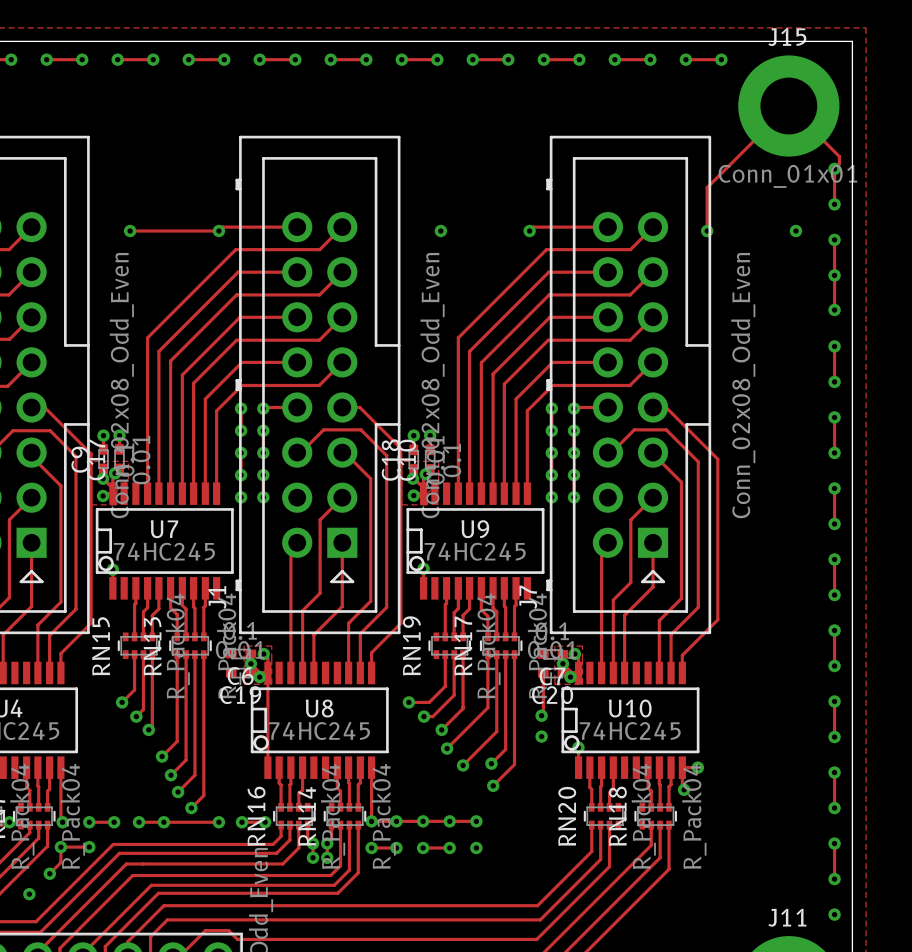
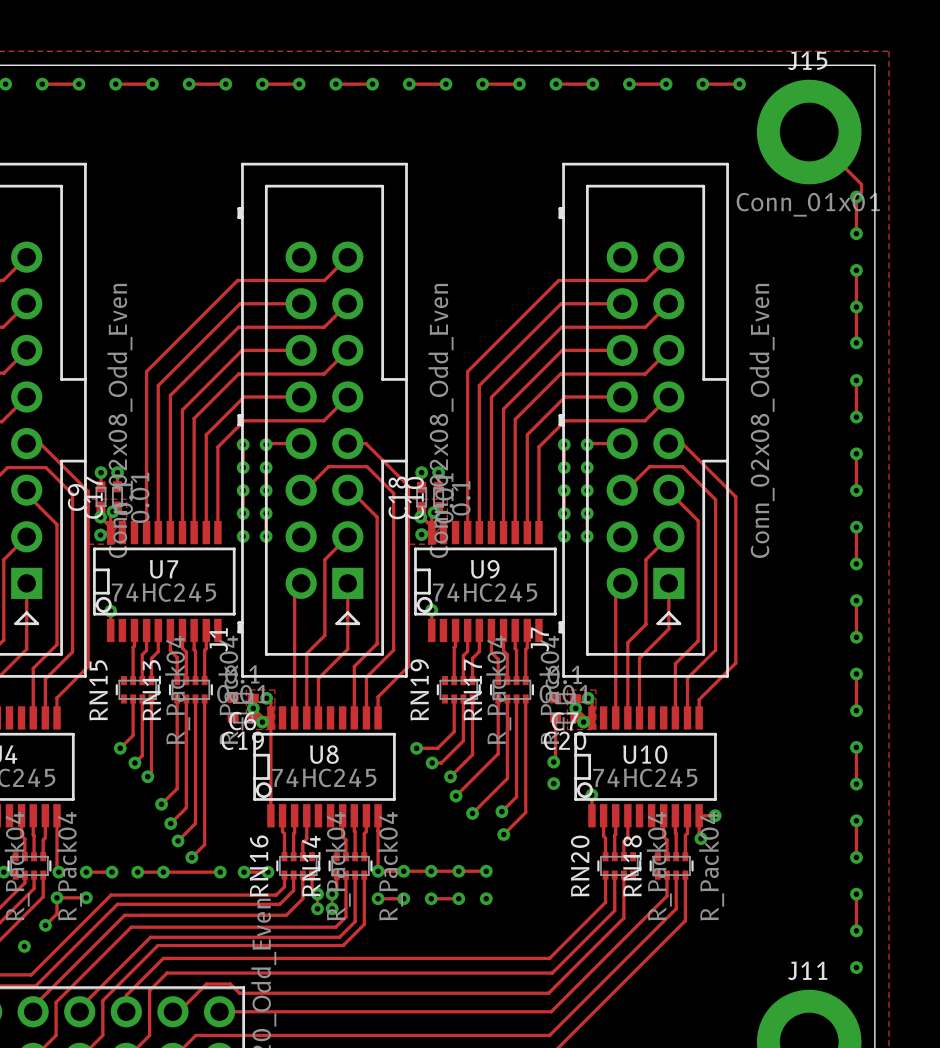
track: (788, 106) (707, 187) (707, 231) -> none
track: (297, 227) (222, 227) (218, 231) (130, 231) -> none
track: (607, 227) (533, 227) (529, 231) -> none
via: (130, 231) -> none
via: (218, 231) -> none
via: (440, 231) -> none
via: (529, 231) -> none
via: (707, 231) -> none
via: (795, 231) -> none

